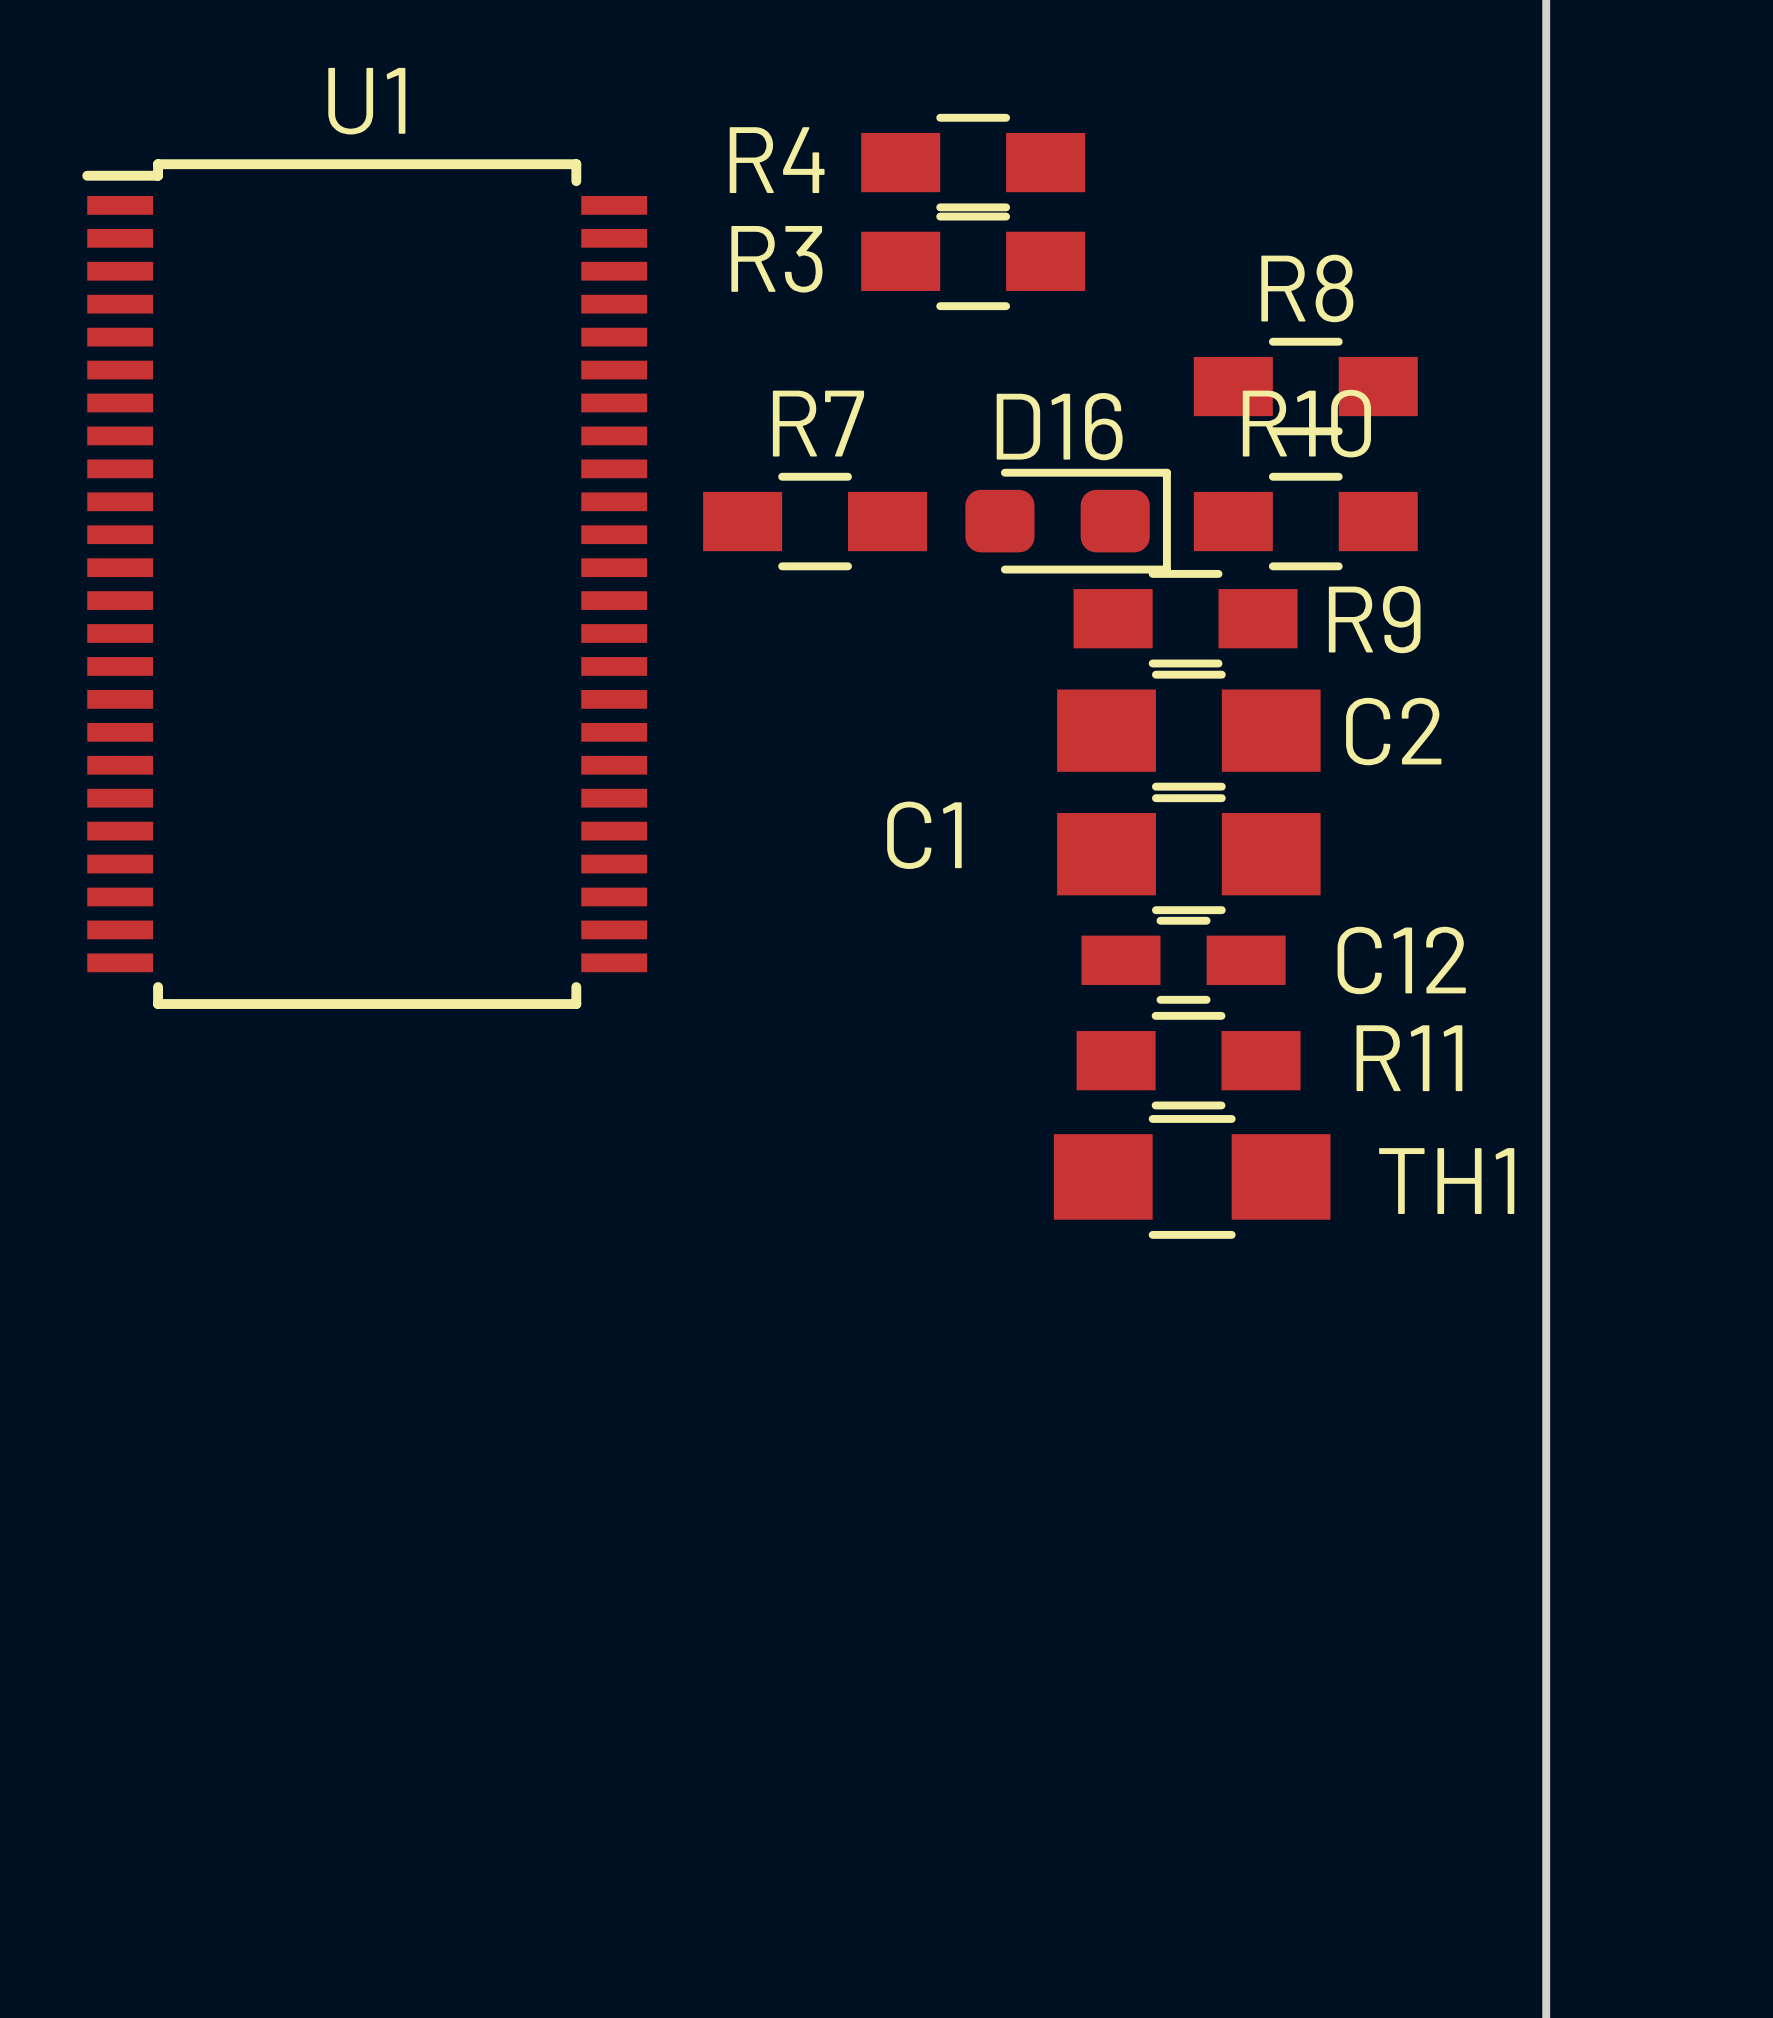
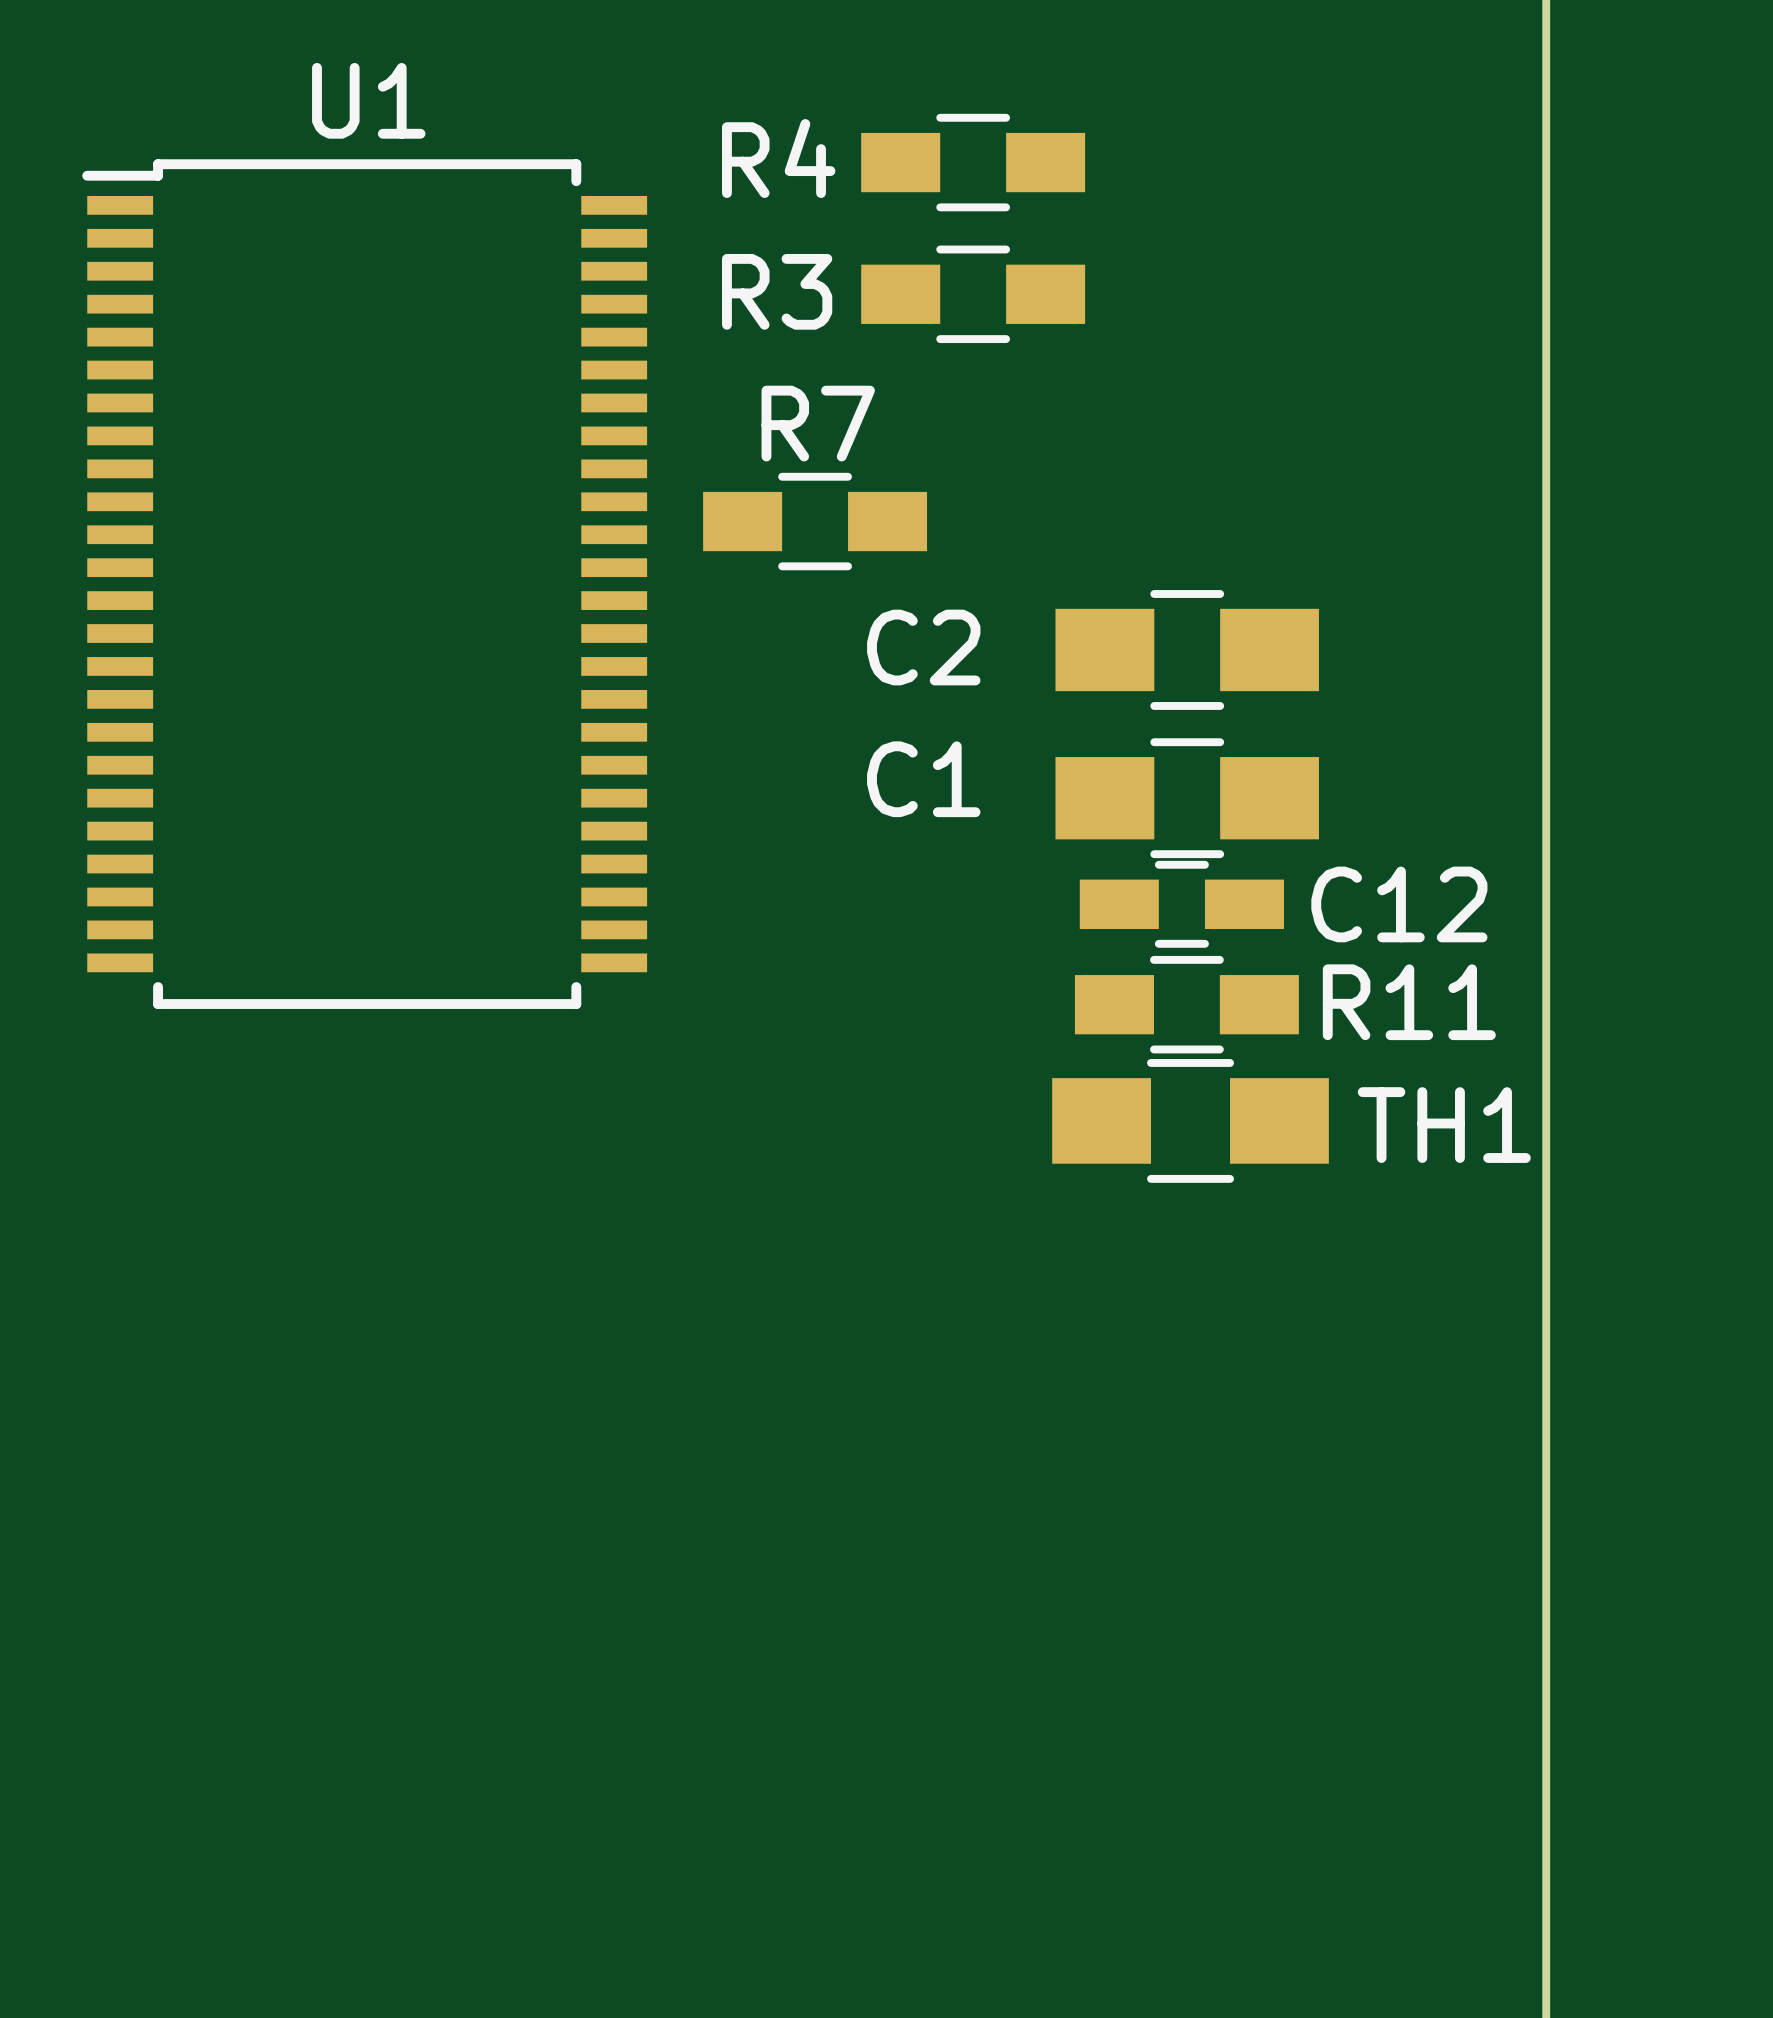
R3 position: (973, 261) -> (973, 294)
R8: (1305, 386) -> none
D16: (1068, 521) -> none
R10: (1305, 521) -> none
R9: (1185, 618) -> none
C2 position: (1188, 730) -> (1187, 649)
C2 name position: C2 (1393, 731) -> C2 (923, 647)
C1 position: (1188, 854) -> (1187, 798)
C12 position: (1183, 960) -> (1181, 904)
R11 position: (1188, 1060) -> (1186, 1004)
TH1 position: (1192, 1176) -> (1190, 1120)

